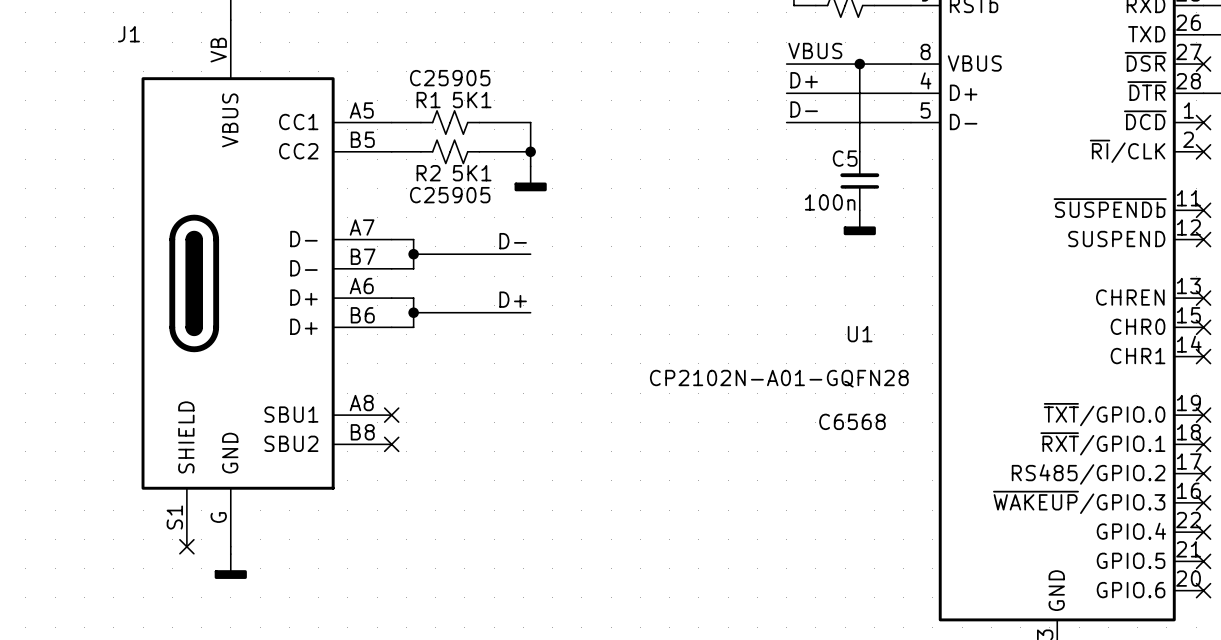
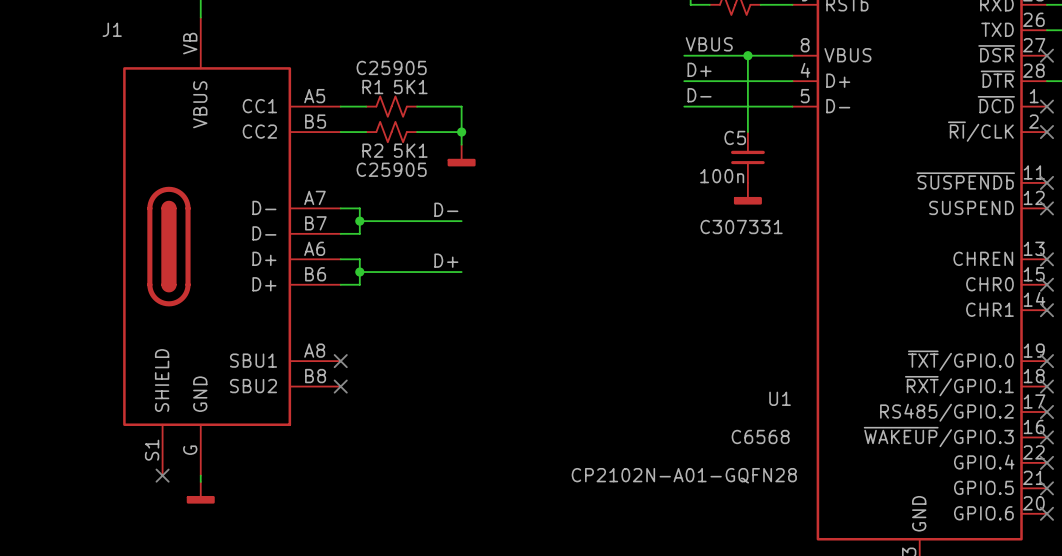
C5 text: none -> C307331 (741, 227)
U1 name position: U1 (860, 334) -> U1 (780, 398)
U1 value position: CP2102N-A01-GQFN28 (779, 378) -> CP2102N-A01-GQFN28 (684, 475)
U1 text position: C6568 (852, 421) -> C6568 (760, 436)

